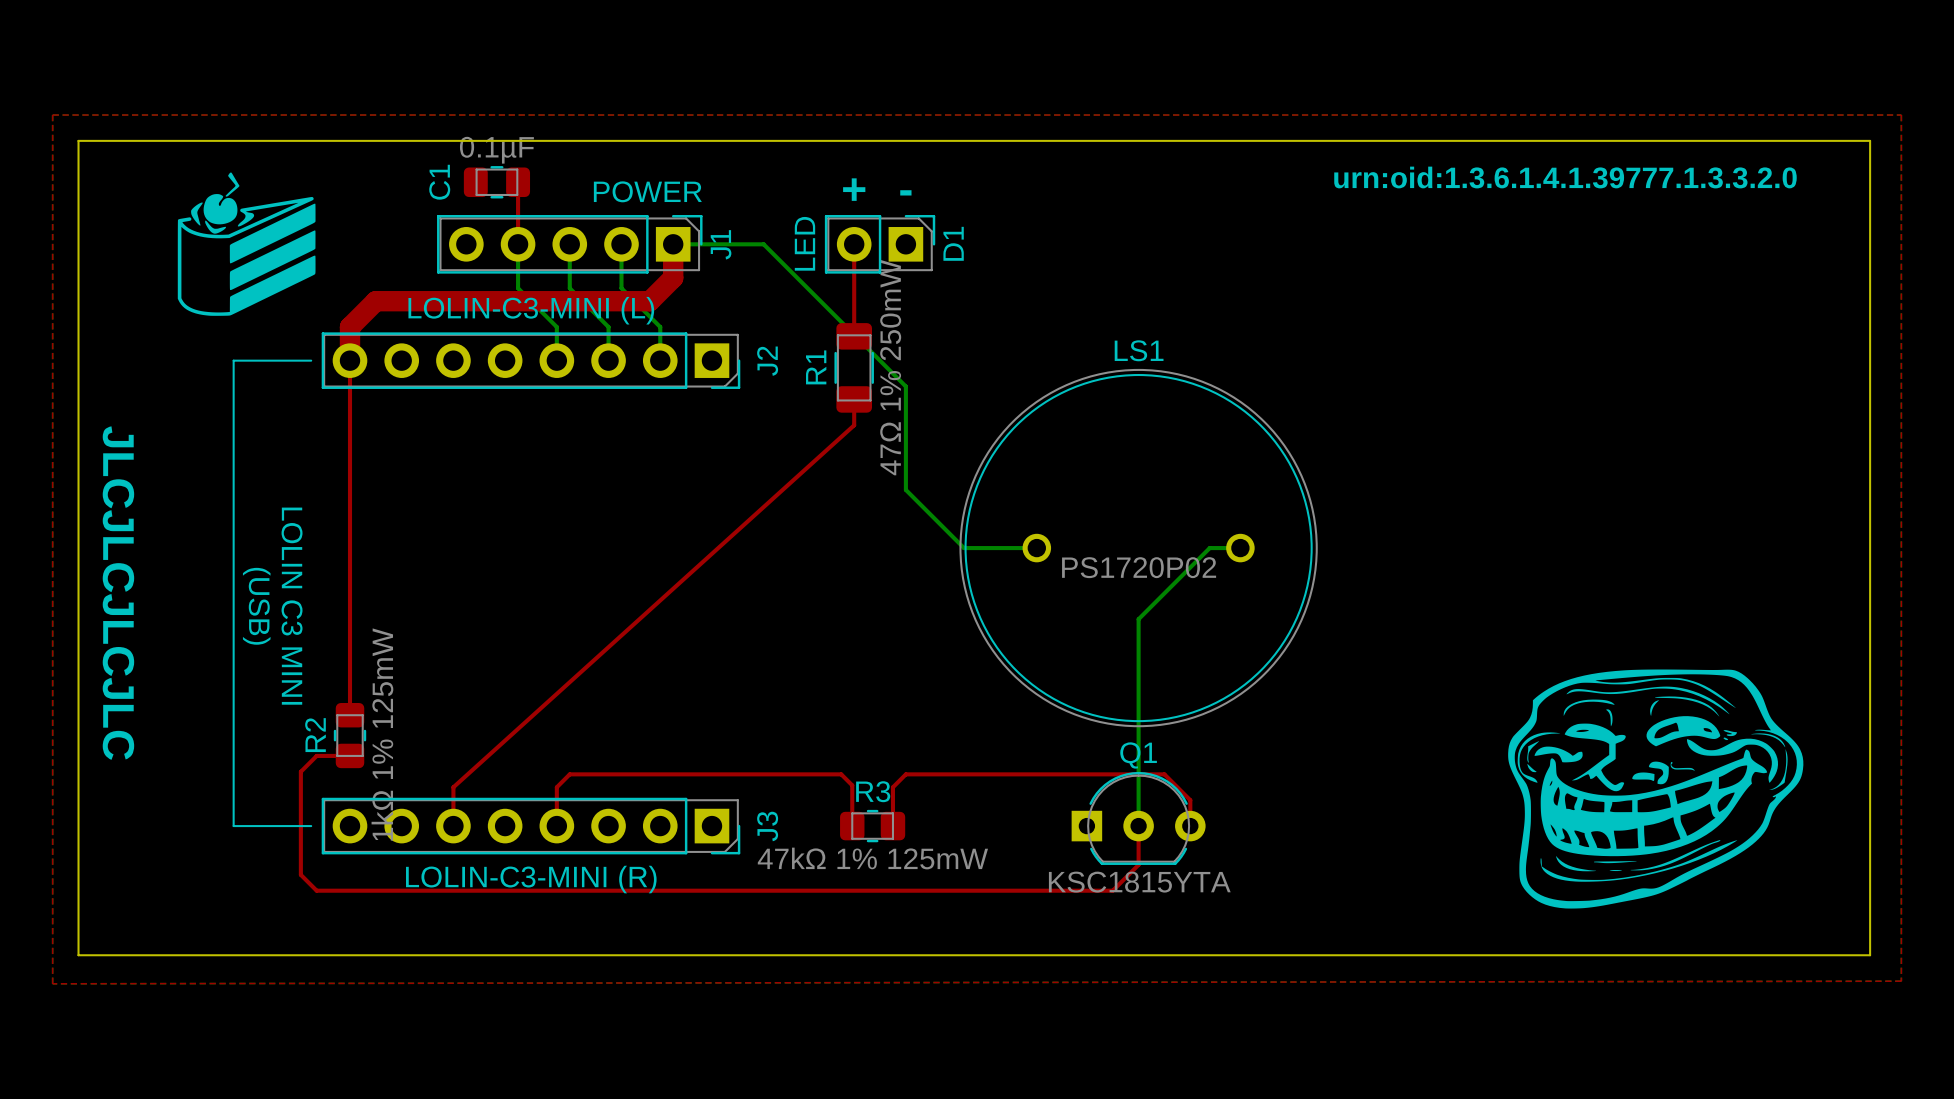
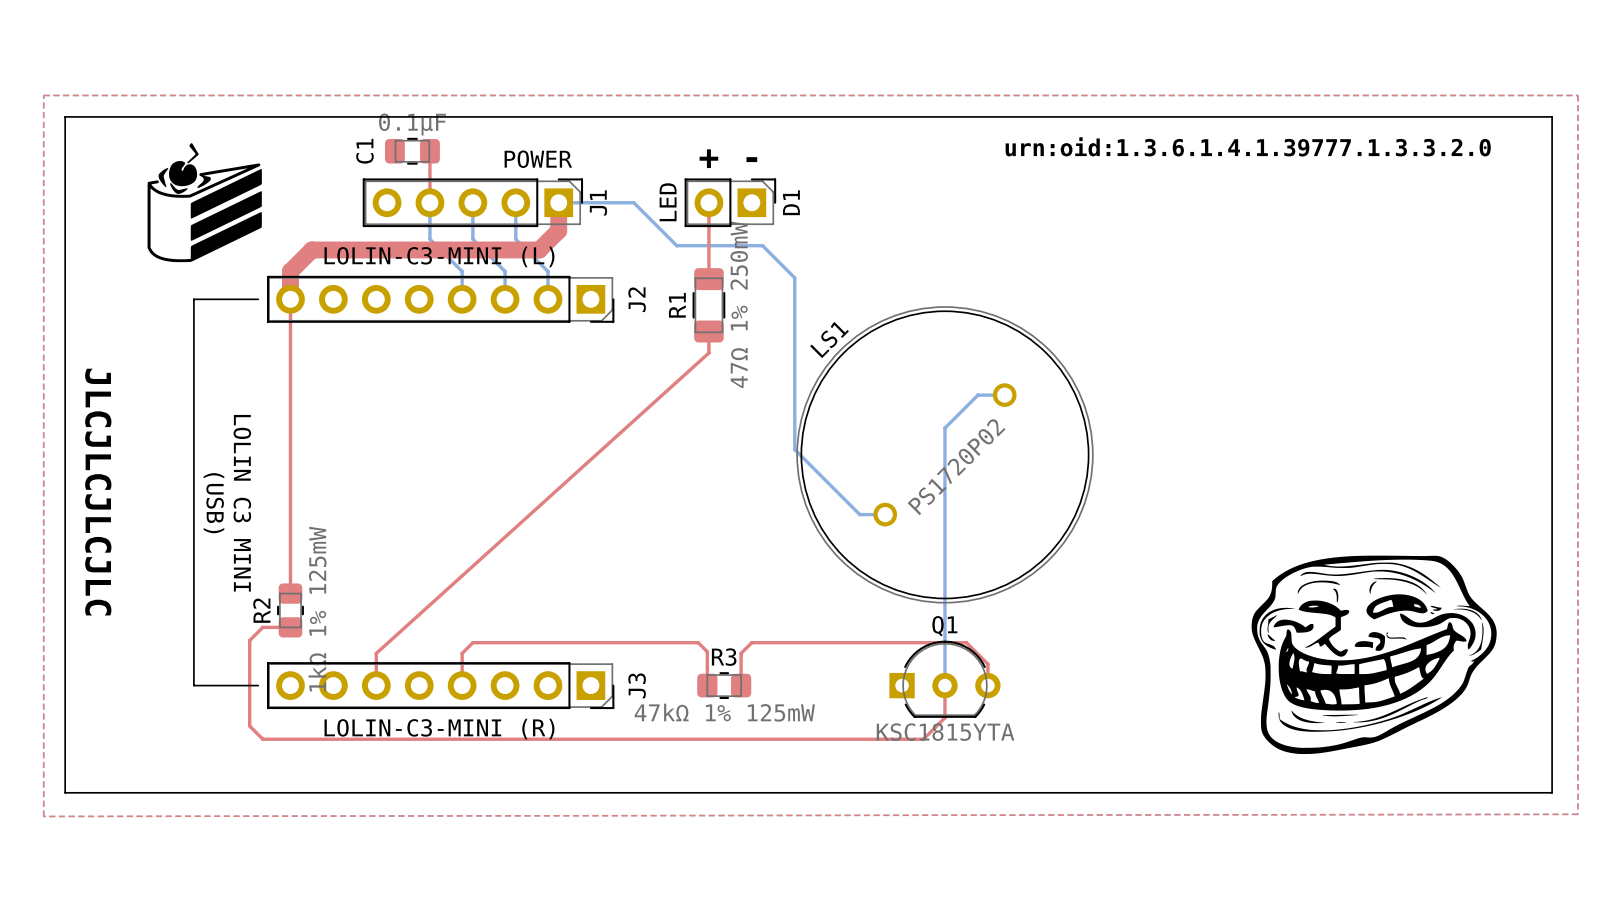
bottom track: (815, 296) (905, 386) (905, 489) (957, 541) -> (676, 245) (762, 245) (794, 277) (794, 449)
bottom track: (964, 548) (1036, 548) -> (800, 454) (859, 514) (885, 514)
LS1 rotation: 0° (1138, 548) -> 45° counterclockwise (944, 454)
bottom track: (1240, 548) (1209, 548) (1138, 619) -> (1004, 395) (977, 395) (944, 428) (944, 513)

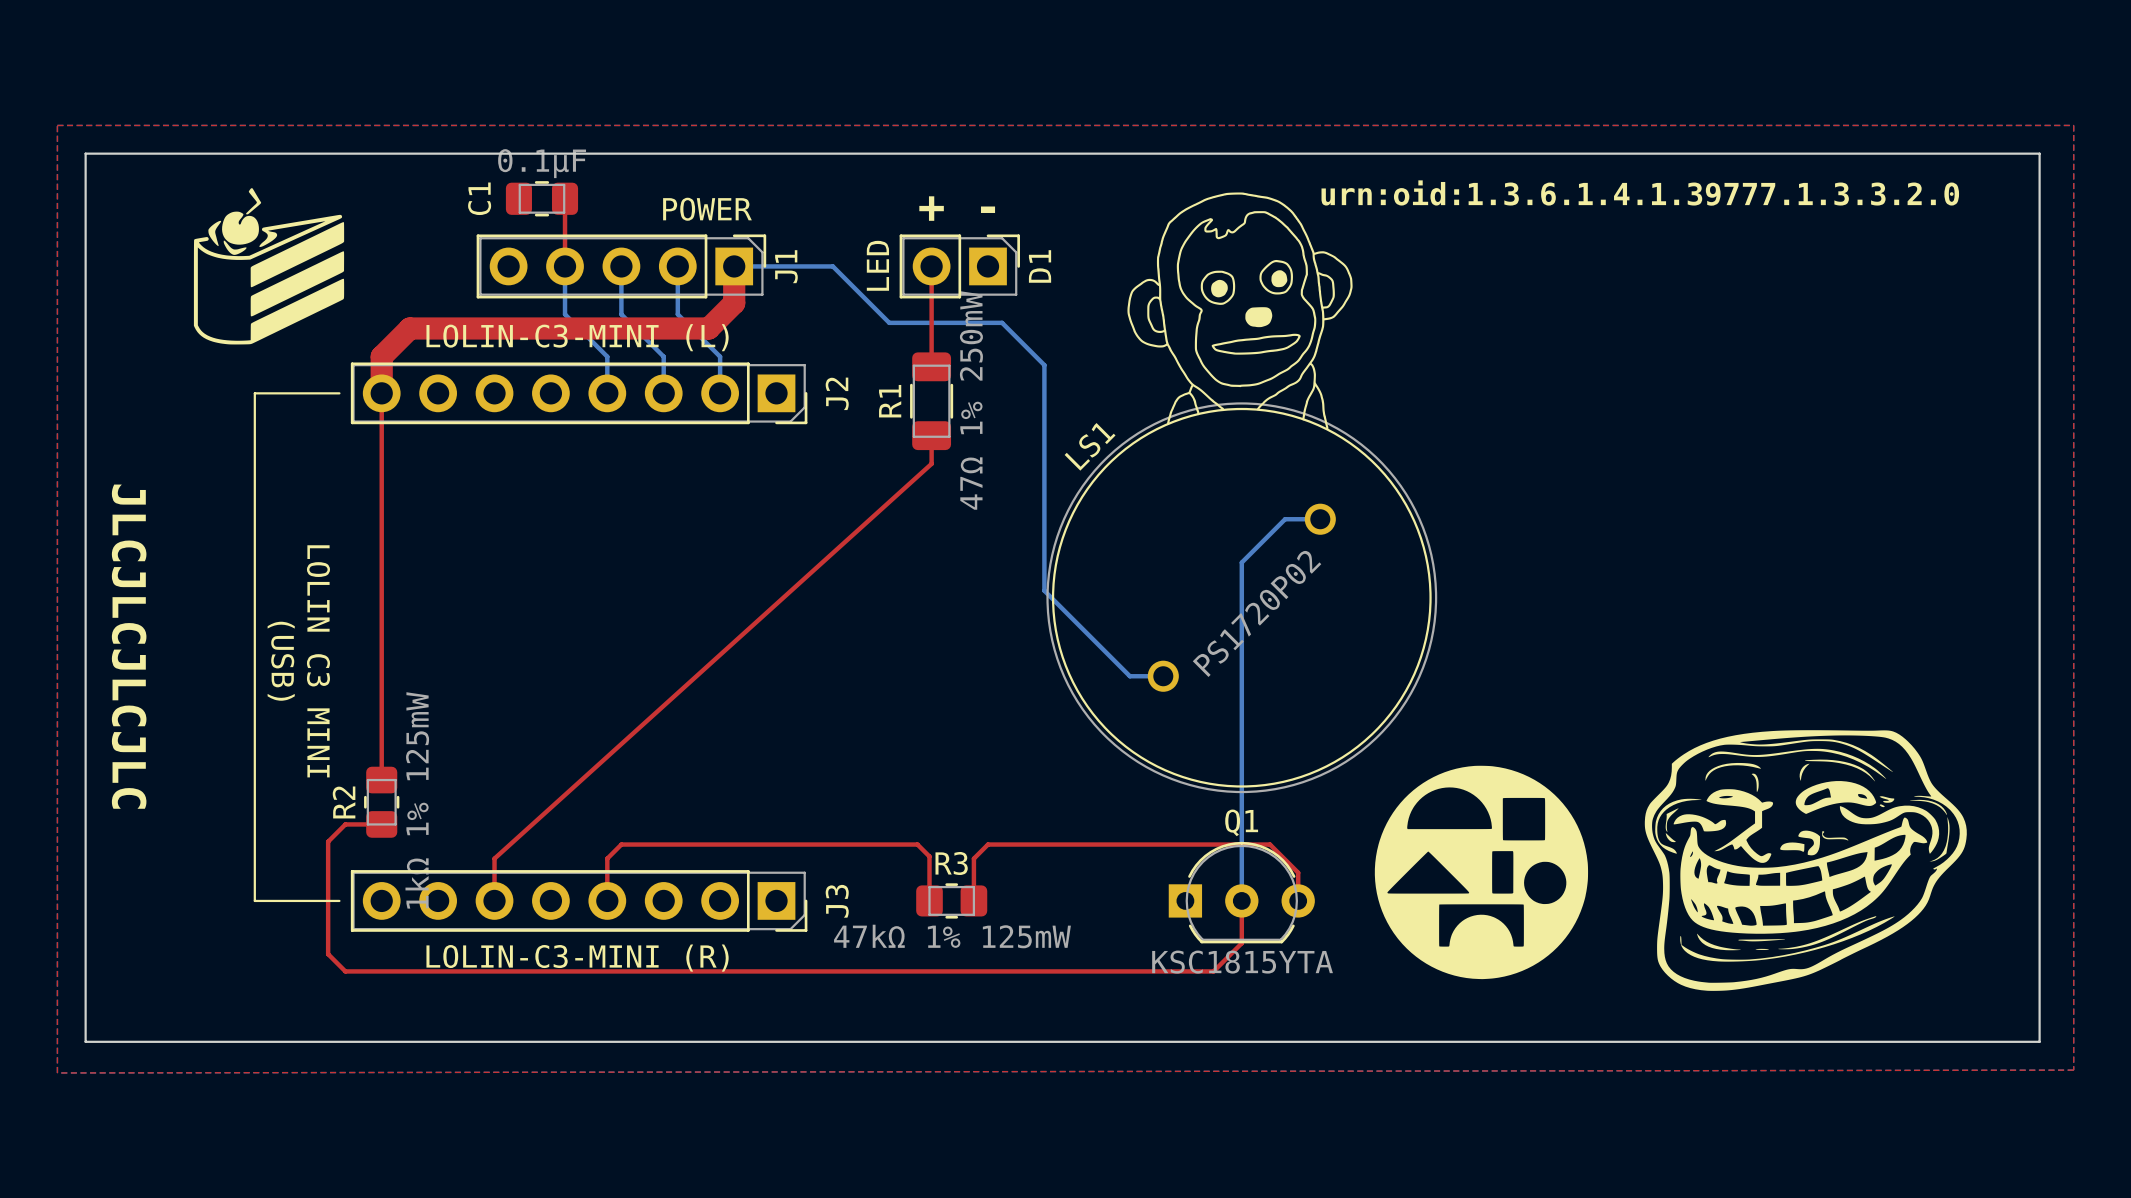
drawing: none -> [1127, 192, 1353, 430]
drawing: none -> [1374, 765, 1589, 980]

